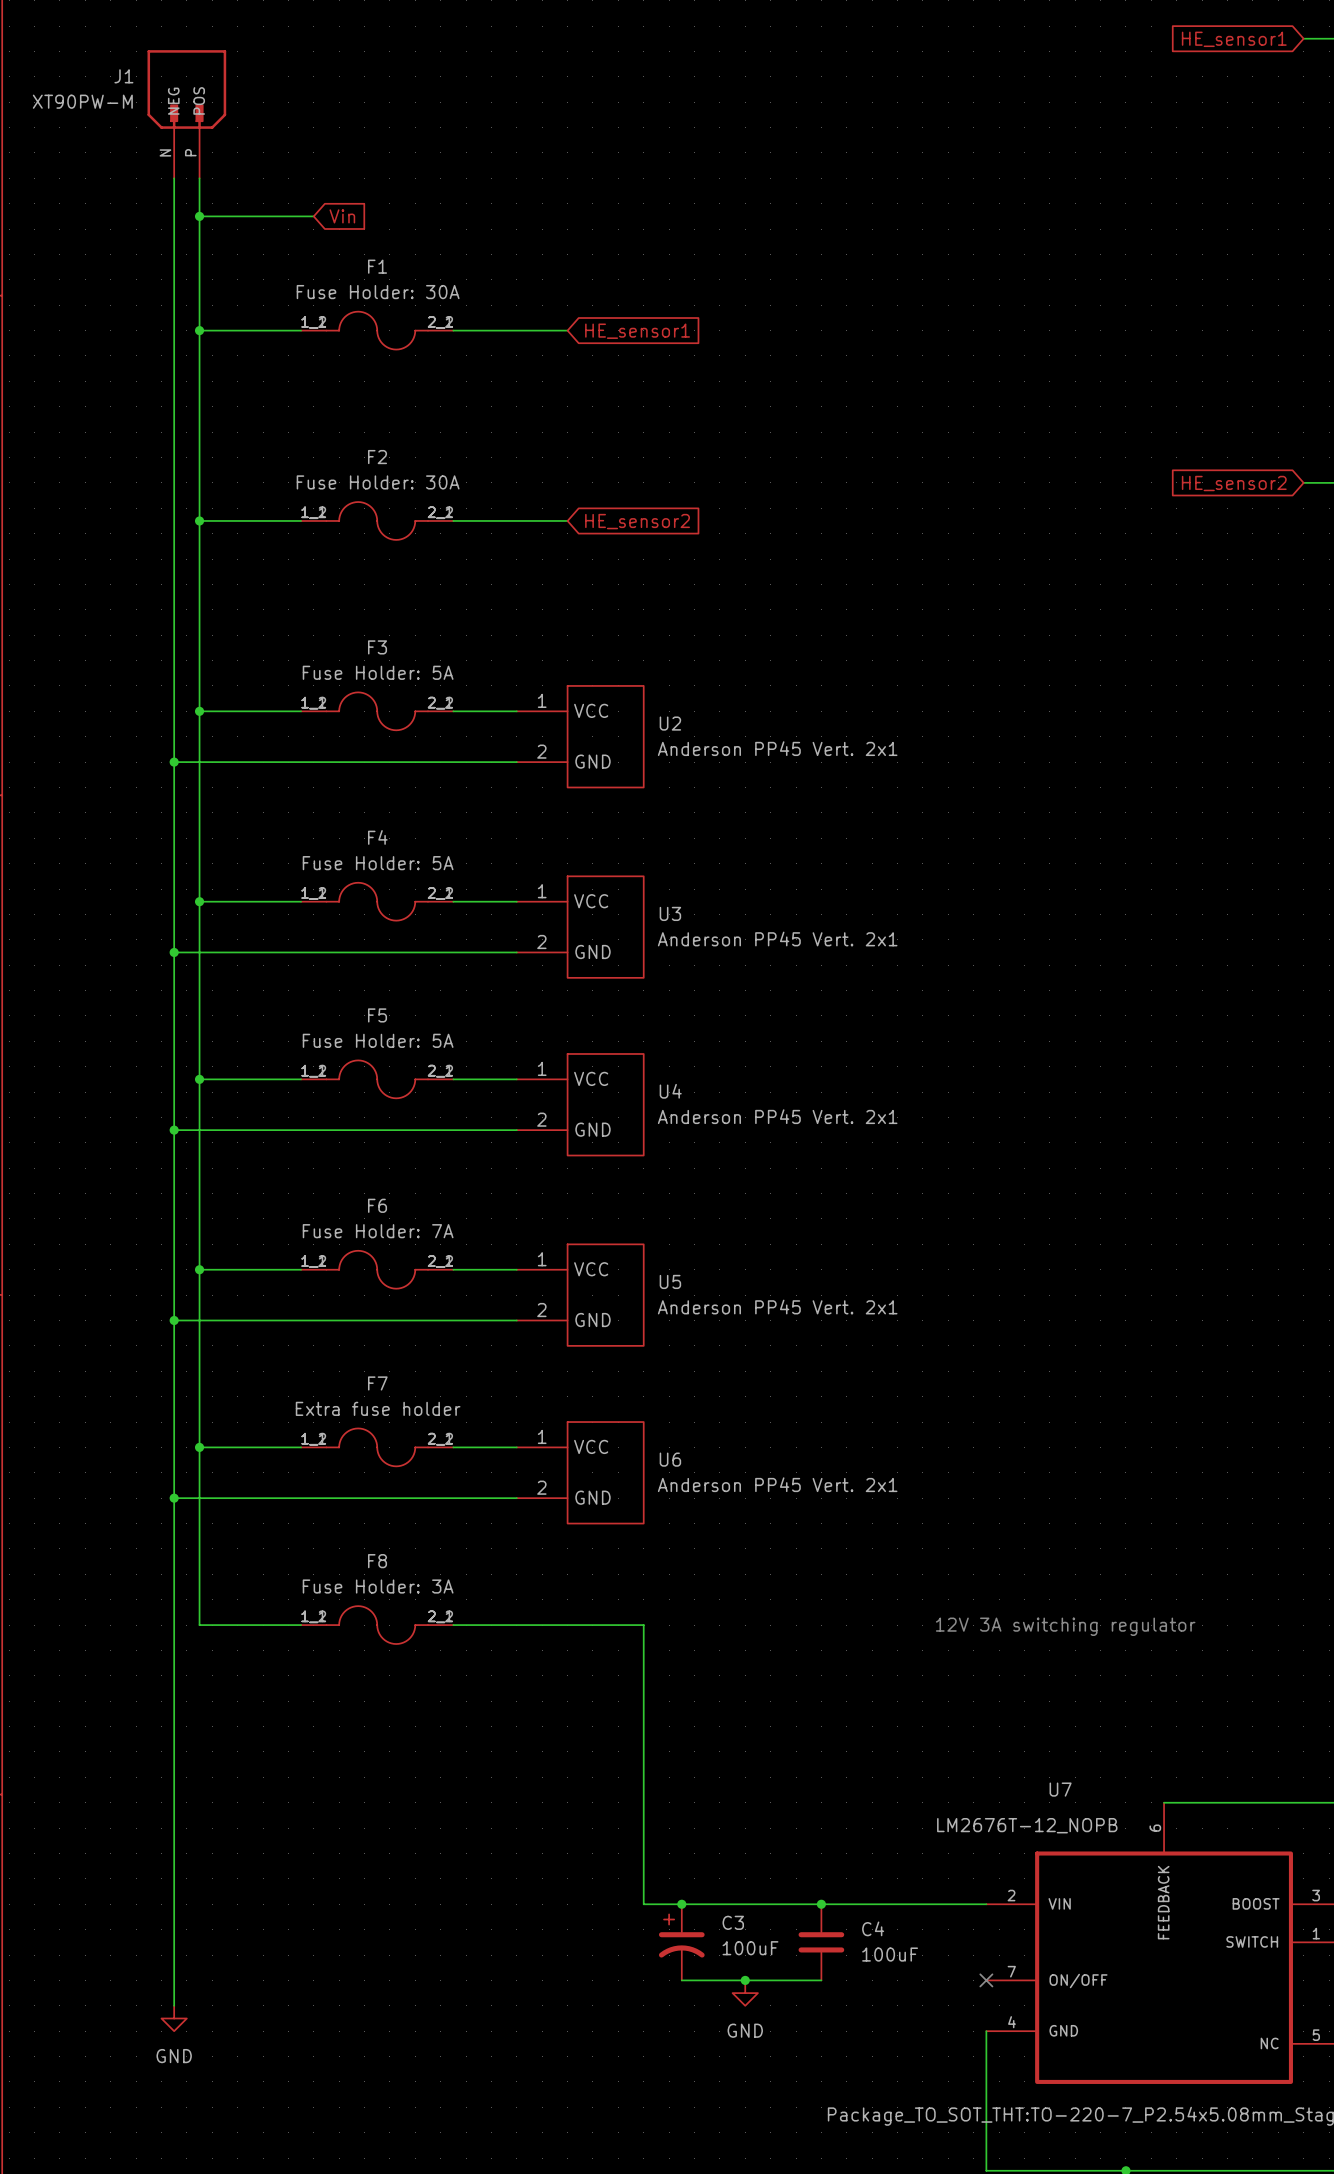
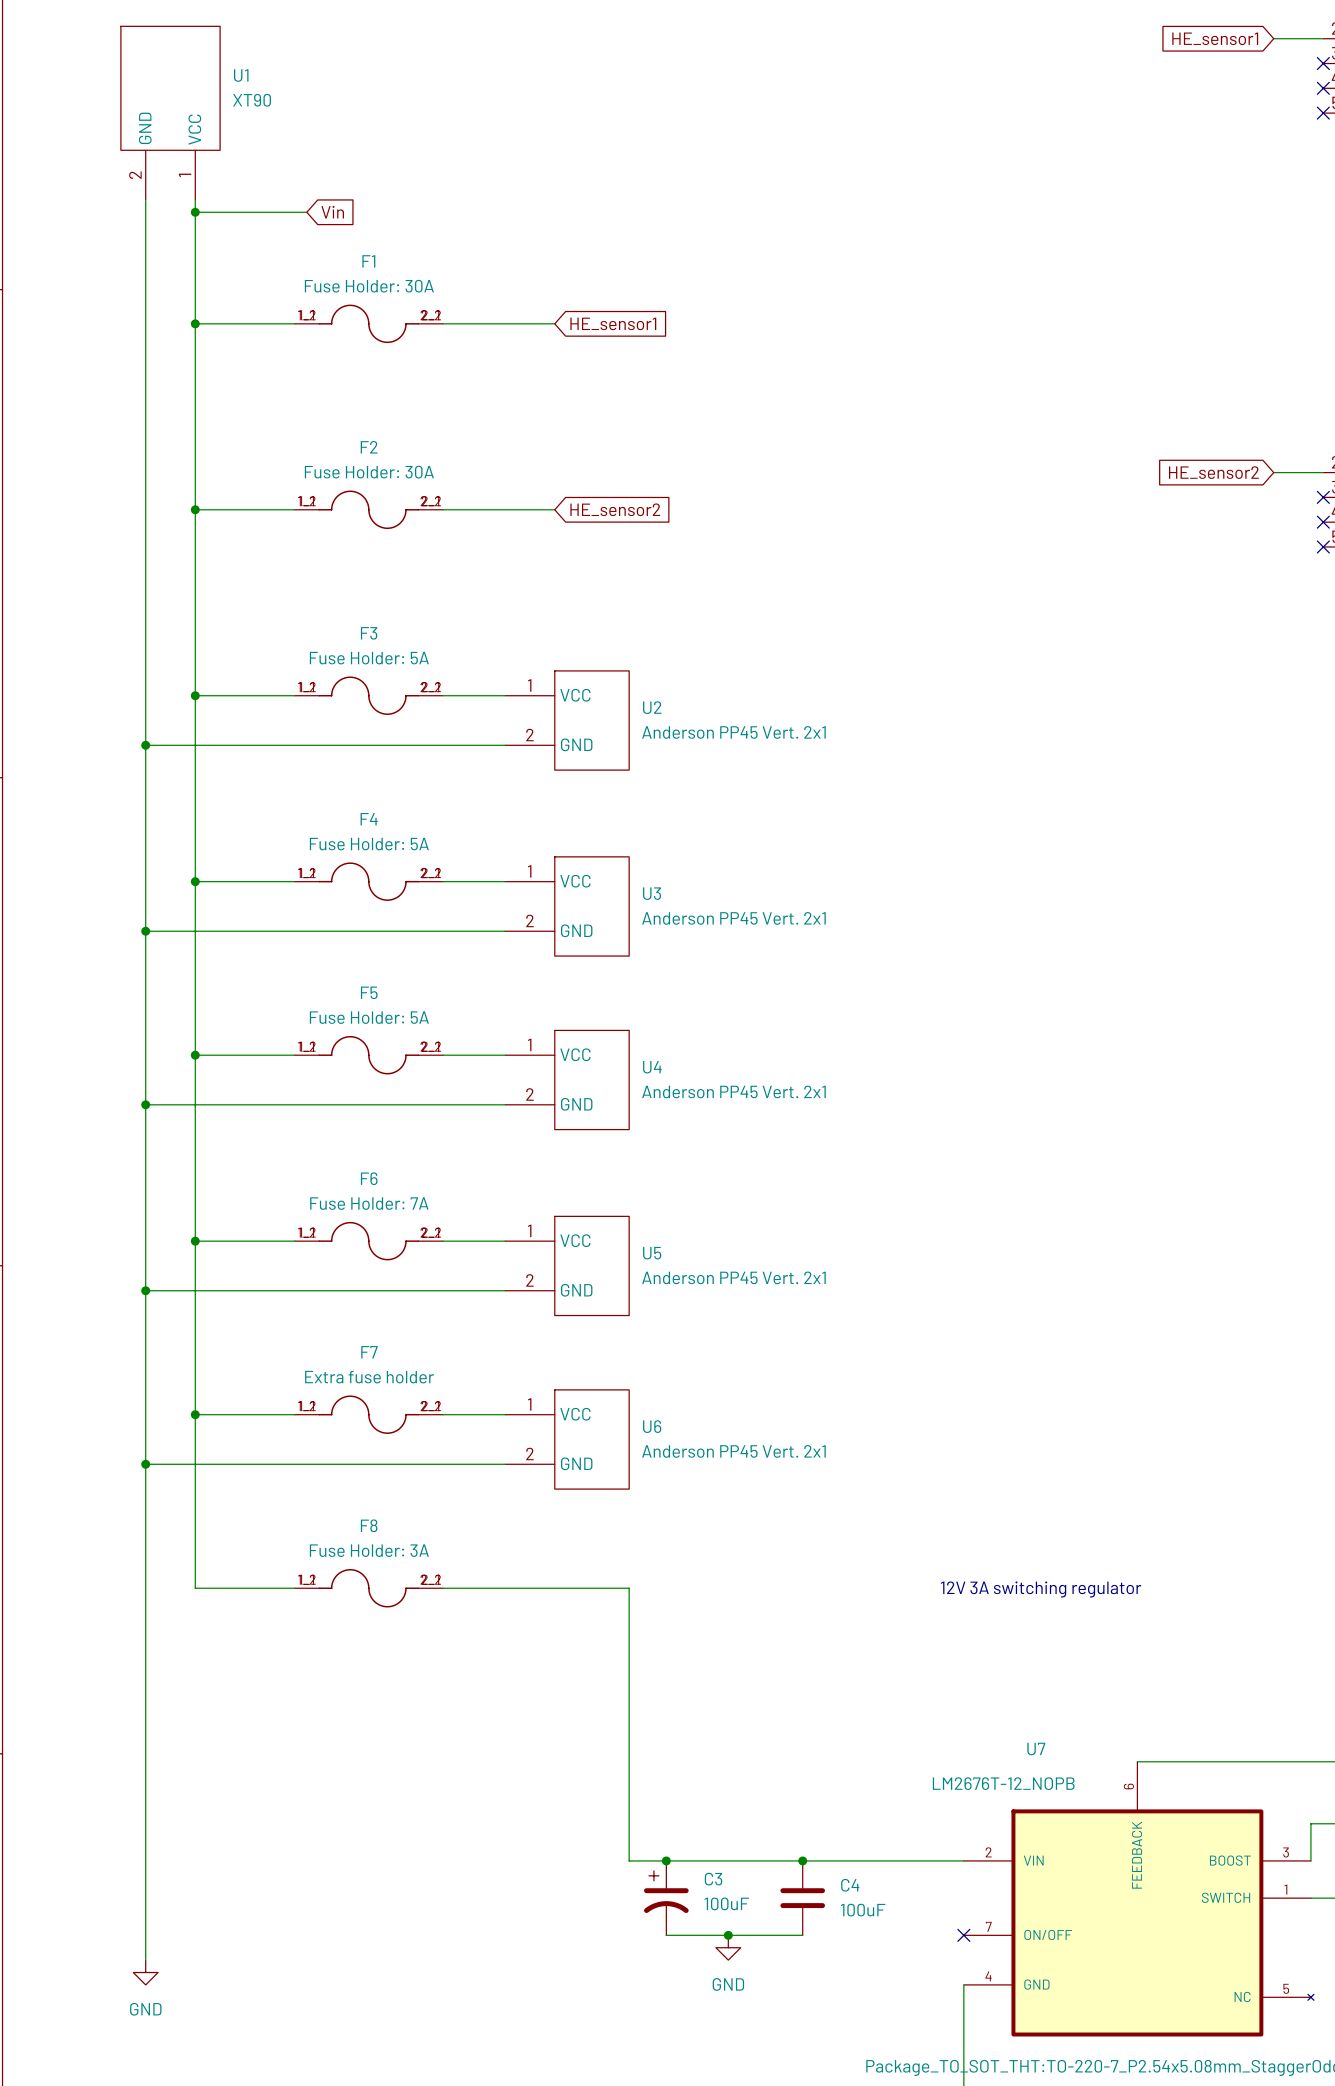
U1: none -> XT90 (170, 113)
J1: XT90PW-M (186, 114) -> none
wire: (174, 178) (174, 2005) -> none
wire: none -> (145, 199) (145, 1960)
wire: none -> (145, 745) (170, 745)
junction position: (174, 762) -> (145, 745)
wire: none -> (145, 931) (170, 931)
junction position: (174, 952) -> (145, 931)
wire: none -> (145, 1104) (170, 1104)
junction position: (174, 1130) -> (145, 1104)
wire: none -> (145, 1290) (170, 1290)
junction position: (174, 1320) -> (145, 1290)
wire: none -> (145, 1464) (170, 1464)
junction position: (174, 1498) -> (145, 1464)
power symbol position: GND (174, 2018) -> GND (145, 1972)

